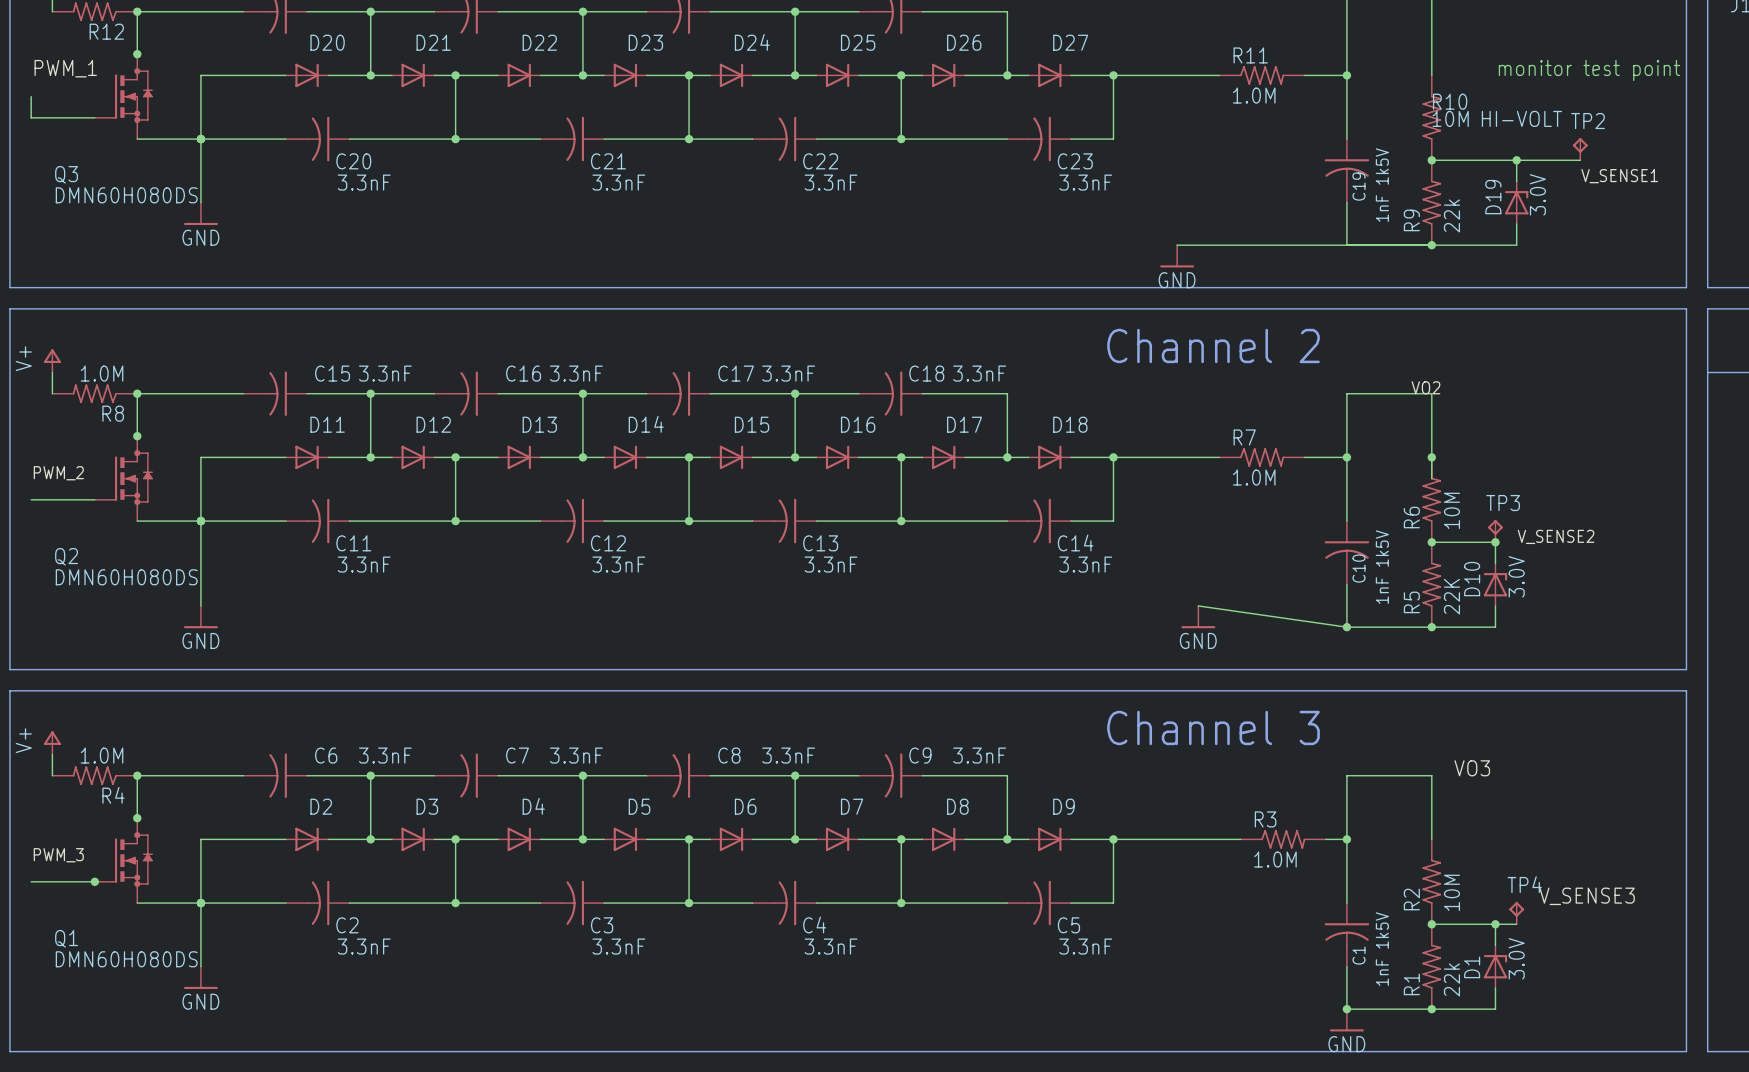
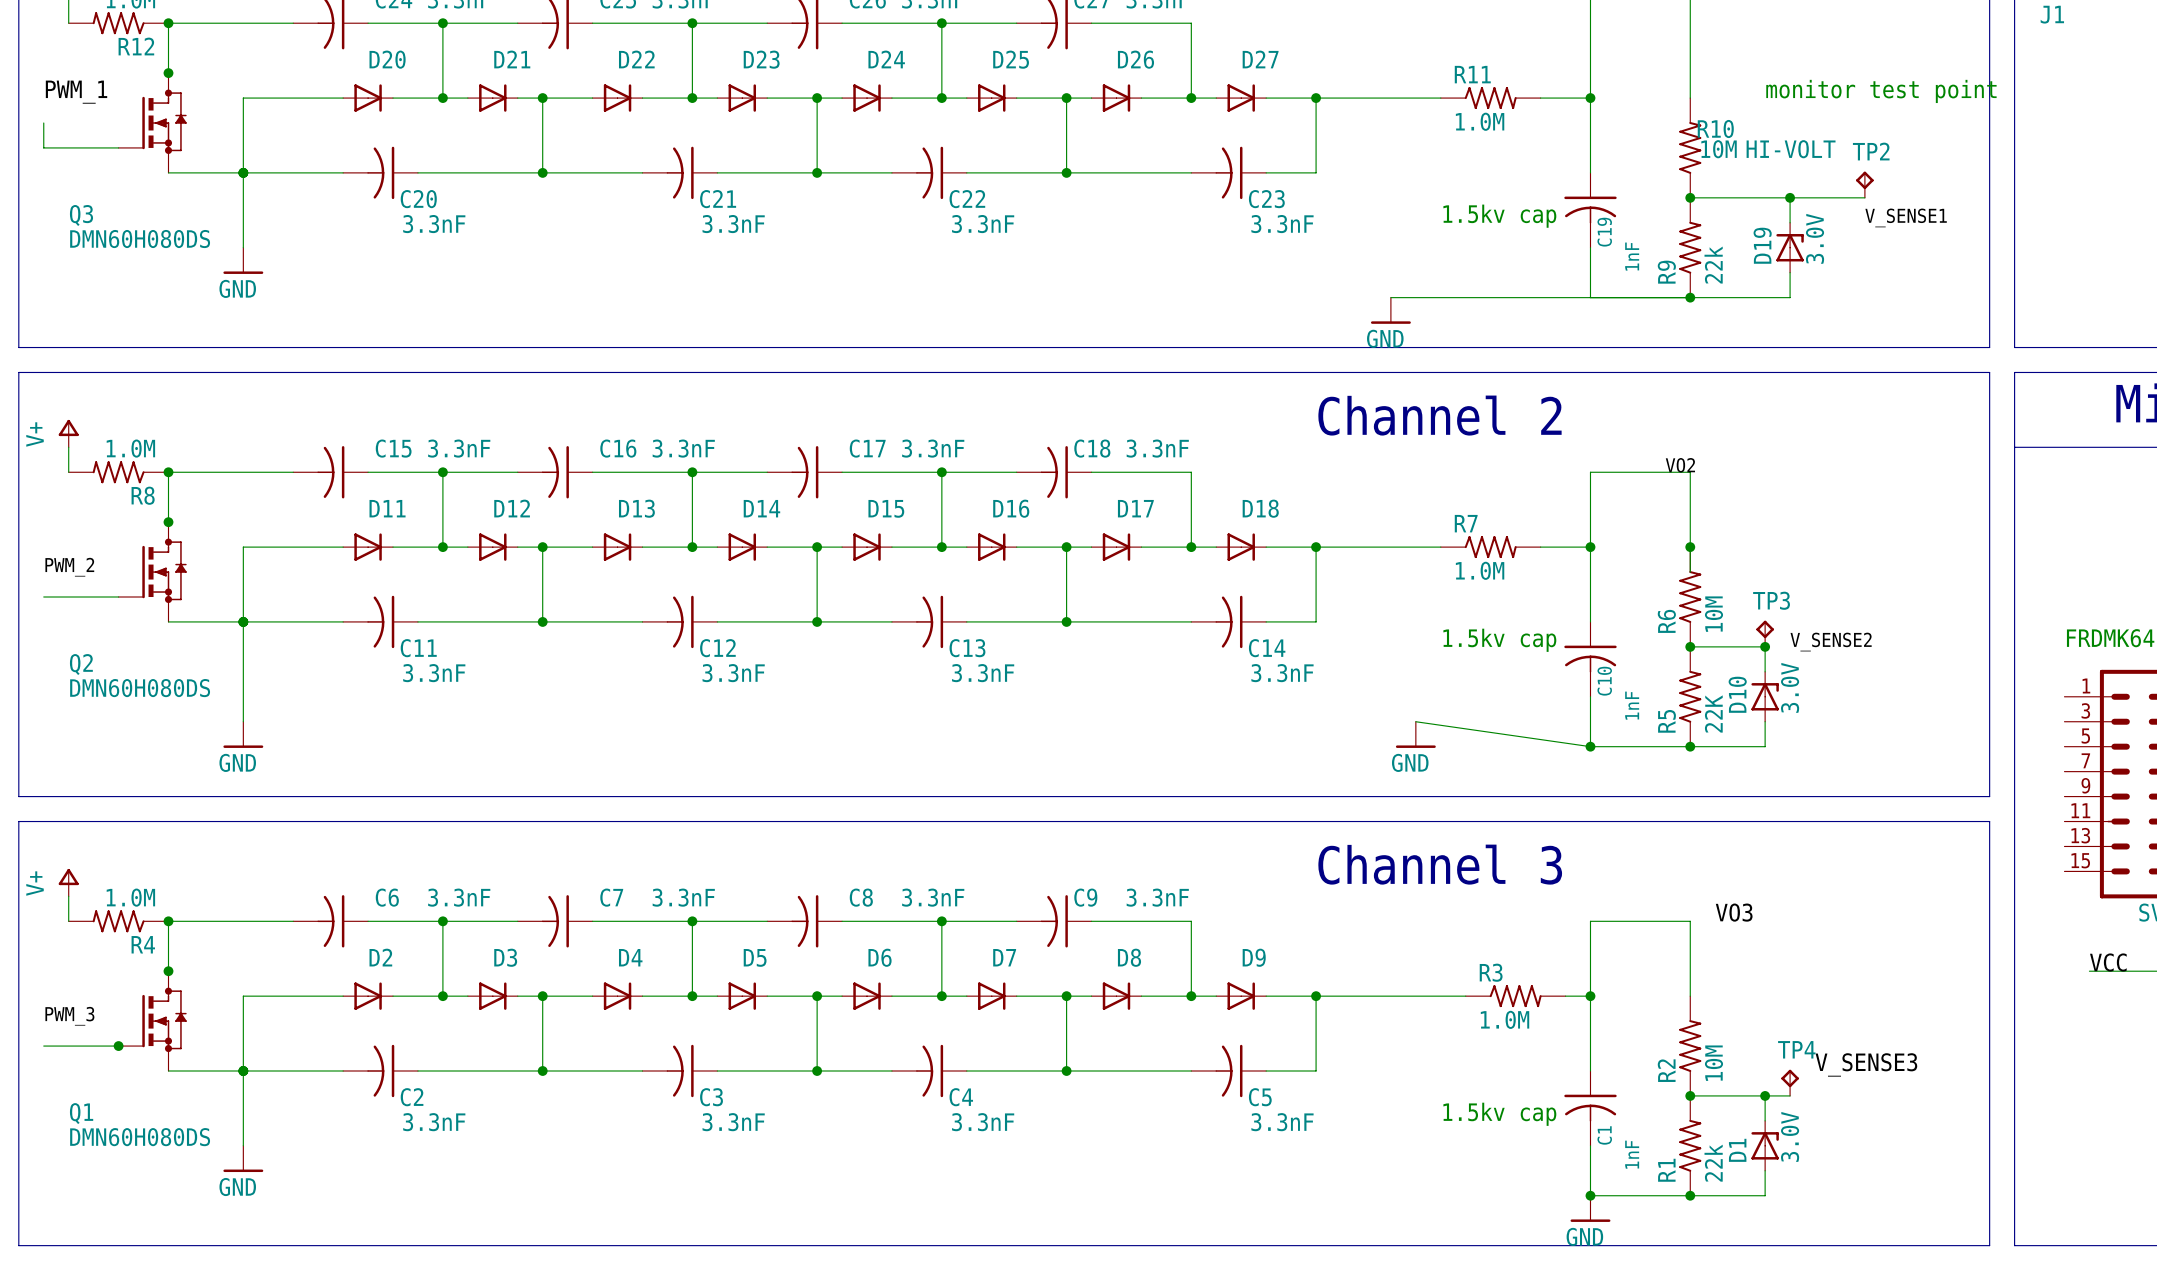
text: none -> 1.5kv cap (1499, 216)
C19 value: 1nF 1k5V (1382, 185) -> 1nF (1632, 256)
text: none -> 1.5kv cap (1499, 640)
C10 value: 1nF 1k5V (1382, 567) -> 1nF (1632, 705)
text: none -> 1.5kv cap (1499, 1114)
C1 value: 1nF 1k5V (1382, 949) -> 1nF (1632, 1154)

